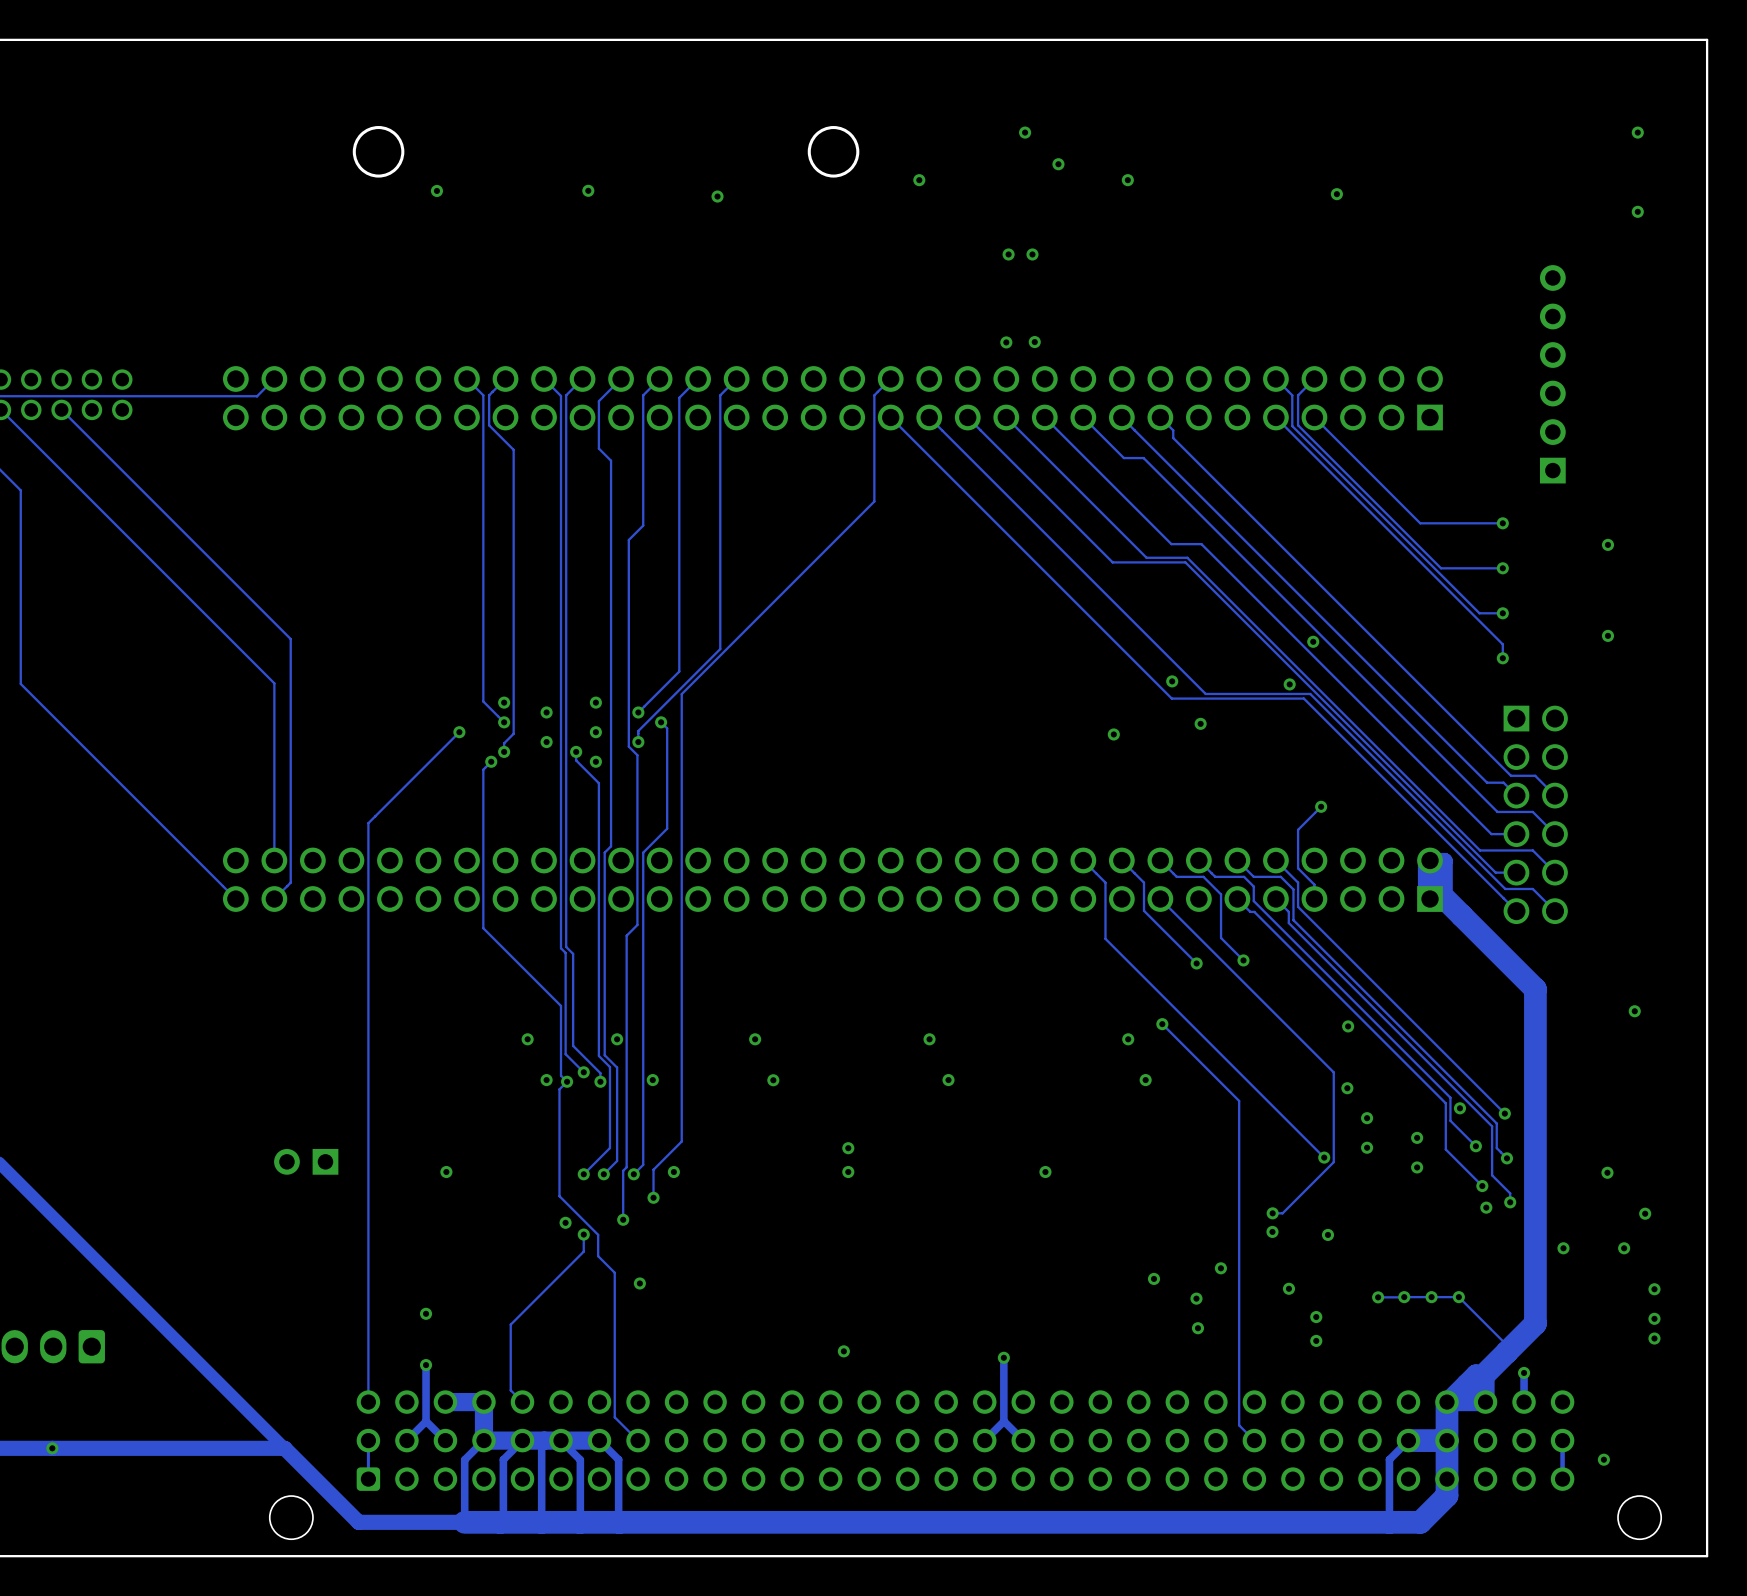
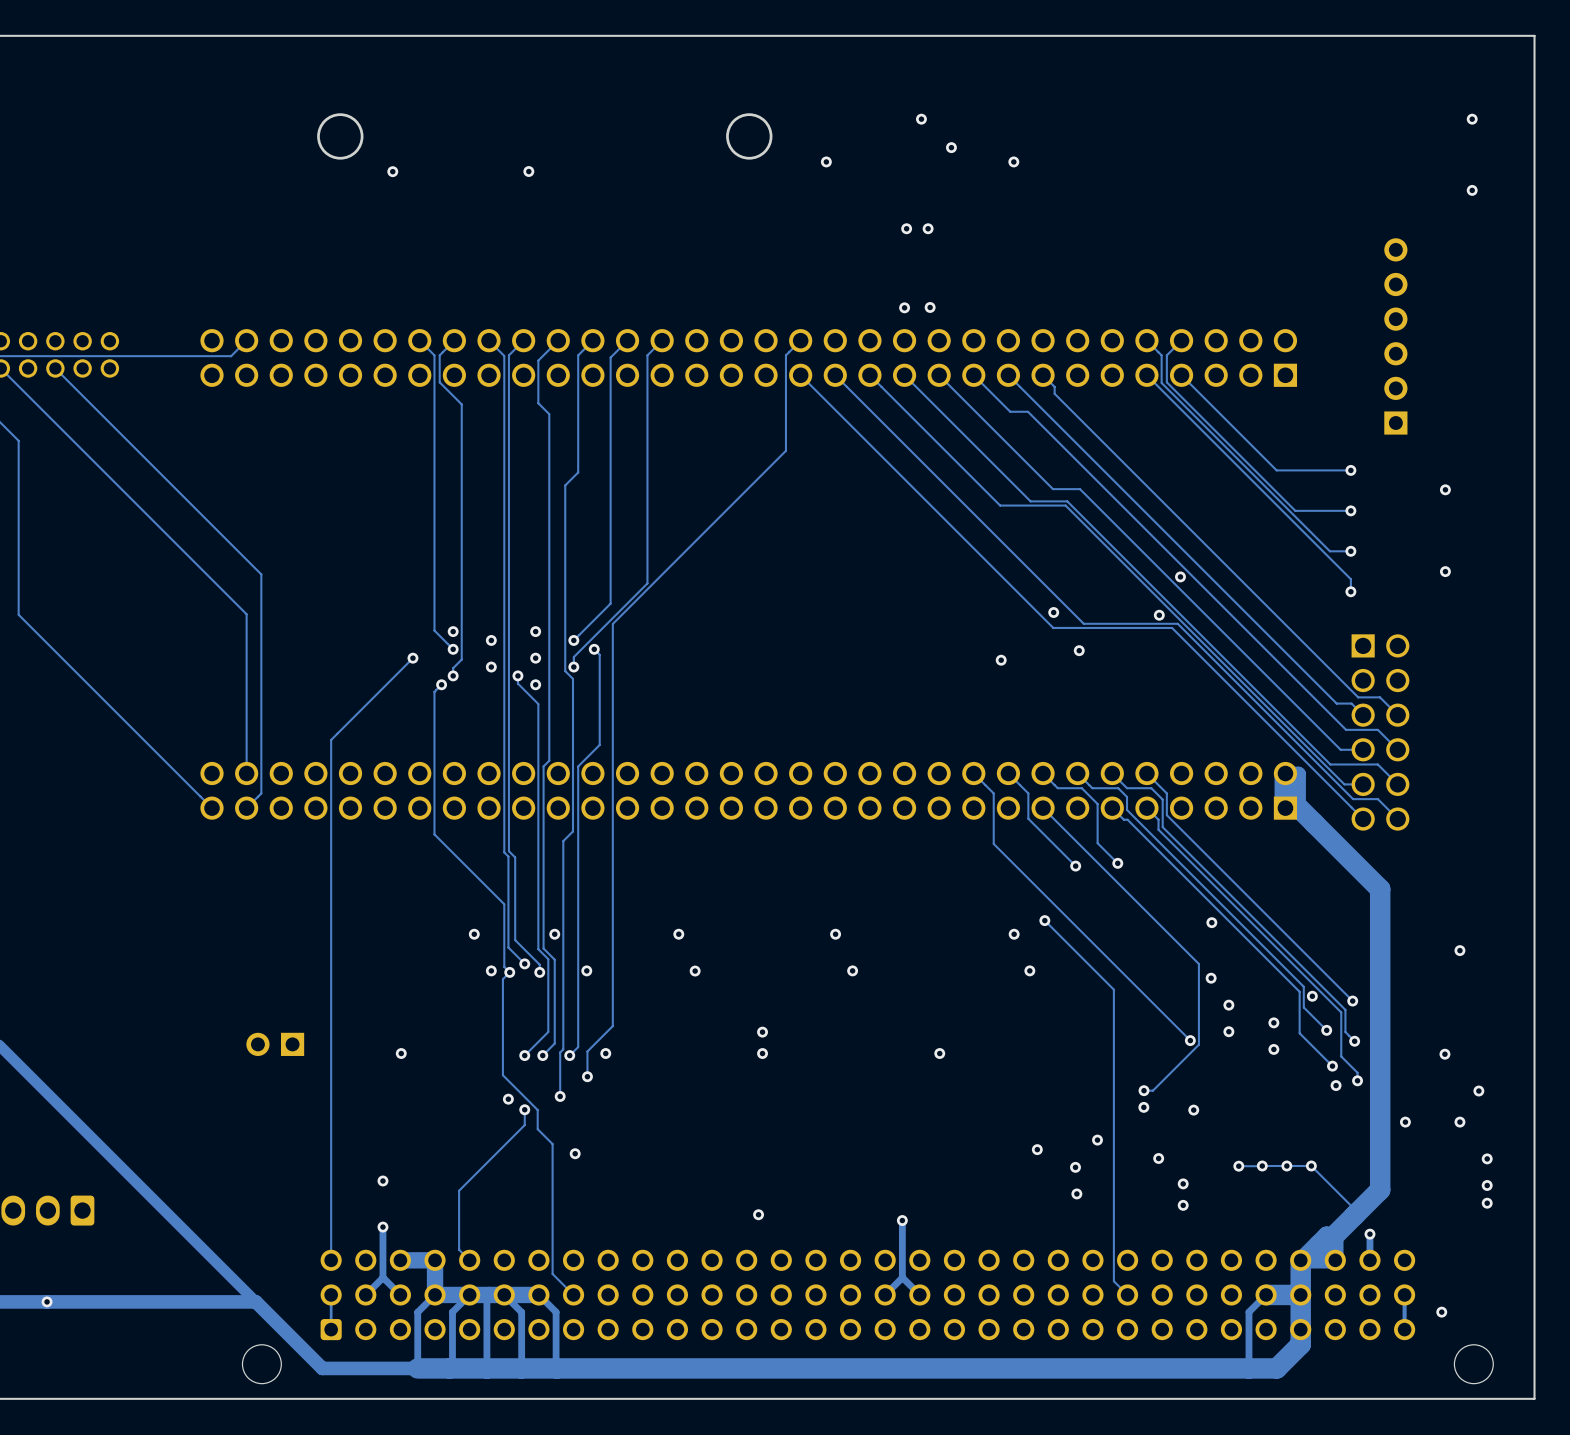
via: (1336, 194) -> none
via: (717, 196) -> none
track: (1321, 806) (1298, 829) (1298, 868) (1314, 884) (1314, 899) -> none
via: (1321, 806) -> none
via position: (1634, 1011) -> (1459, 950)

